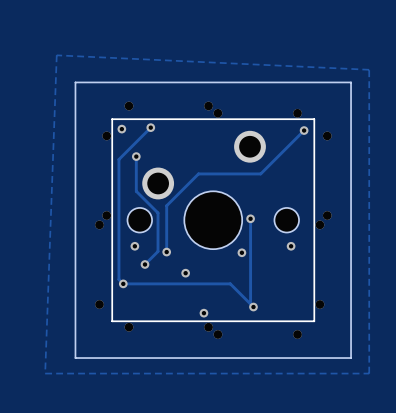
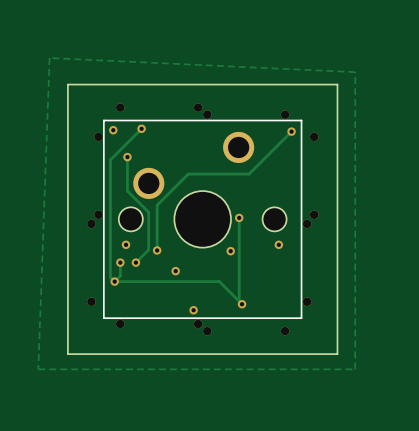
track: none -> (120, 262) (120, 275) (114, 281)
via: none -> (120, 262)

